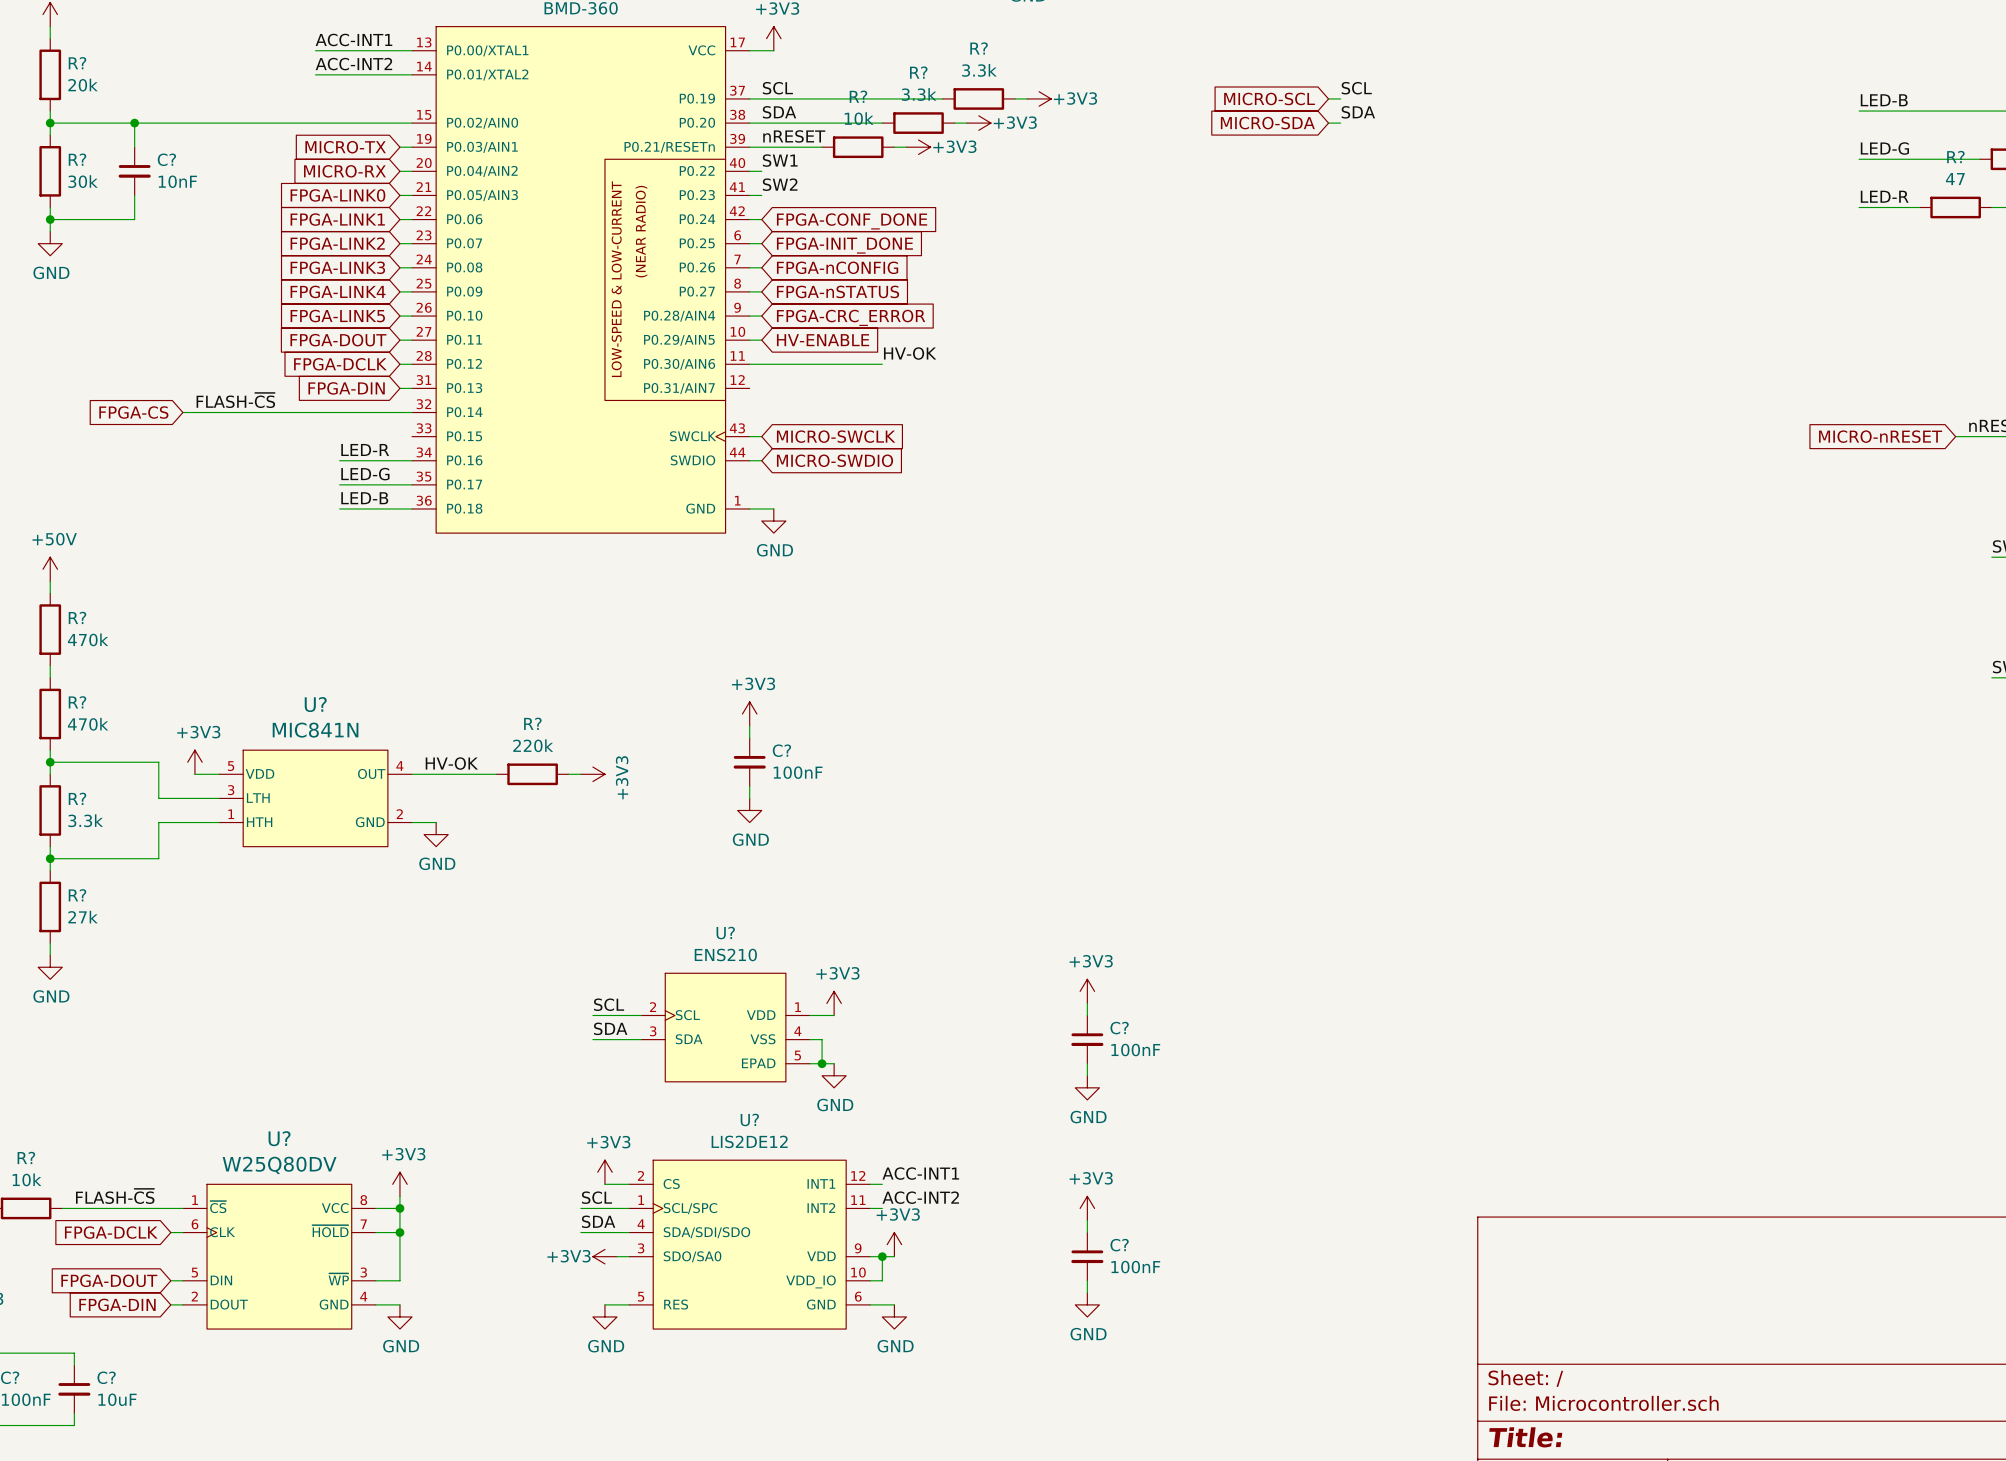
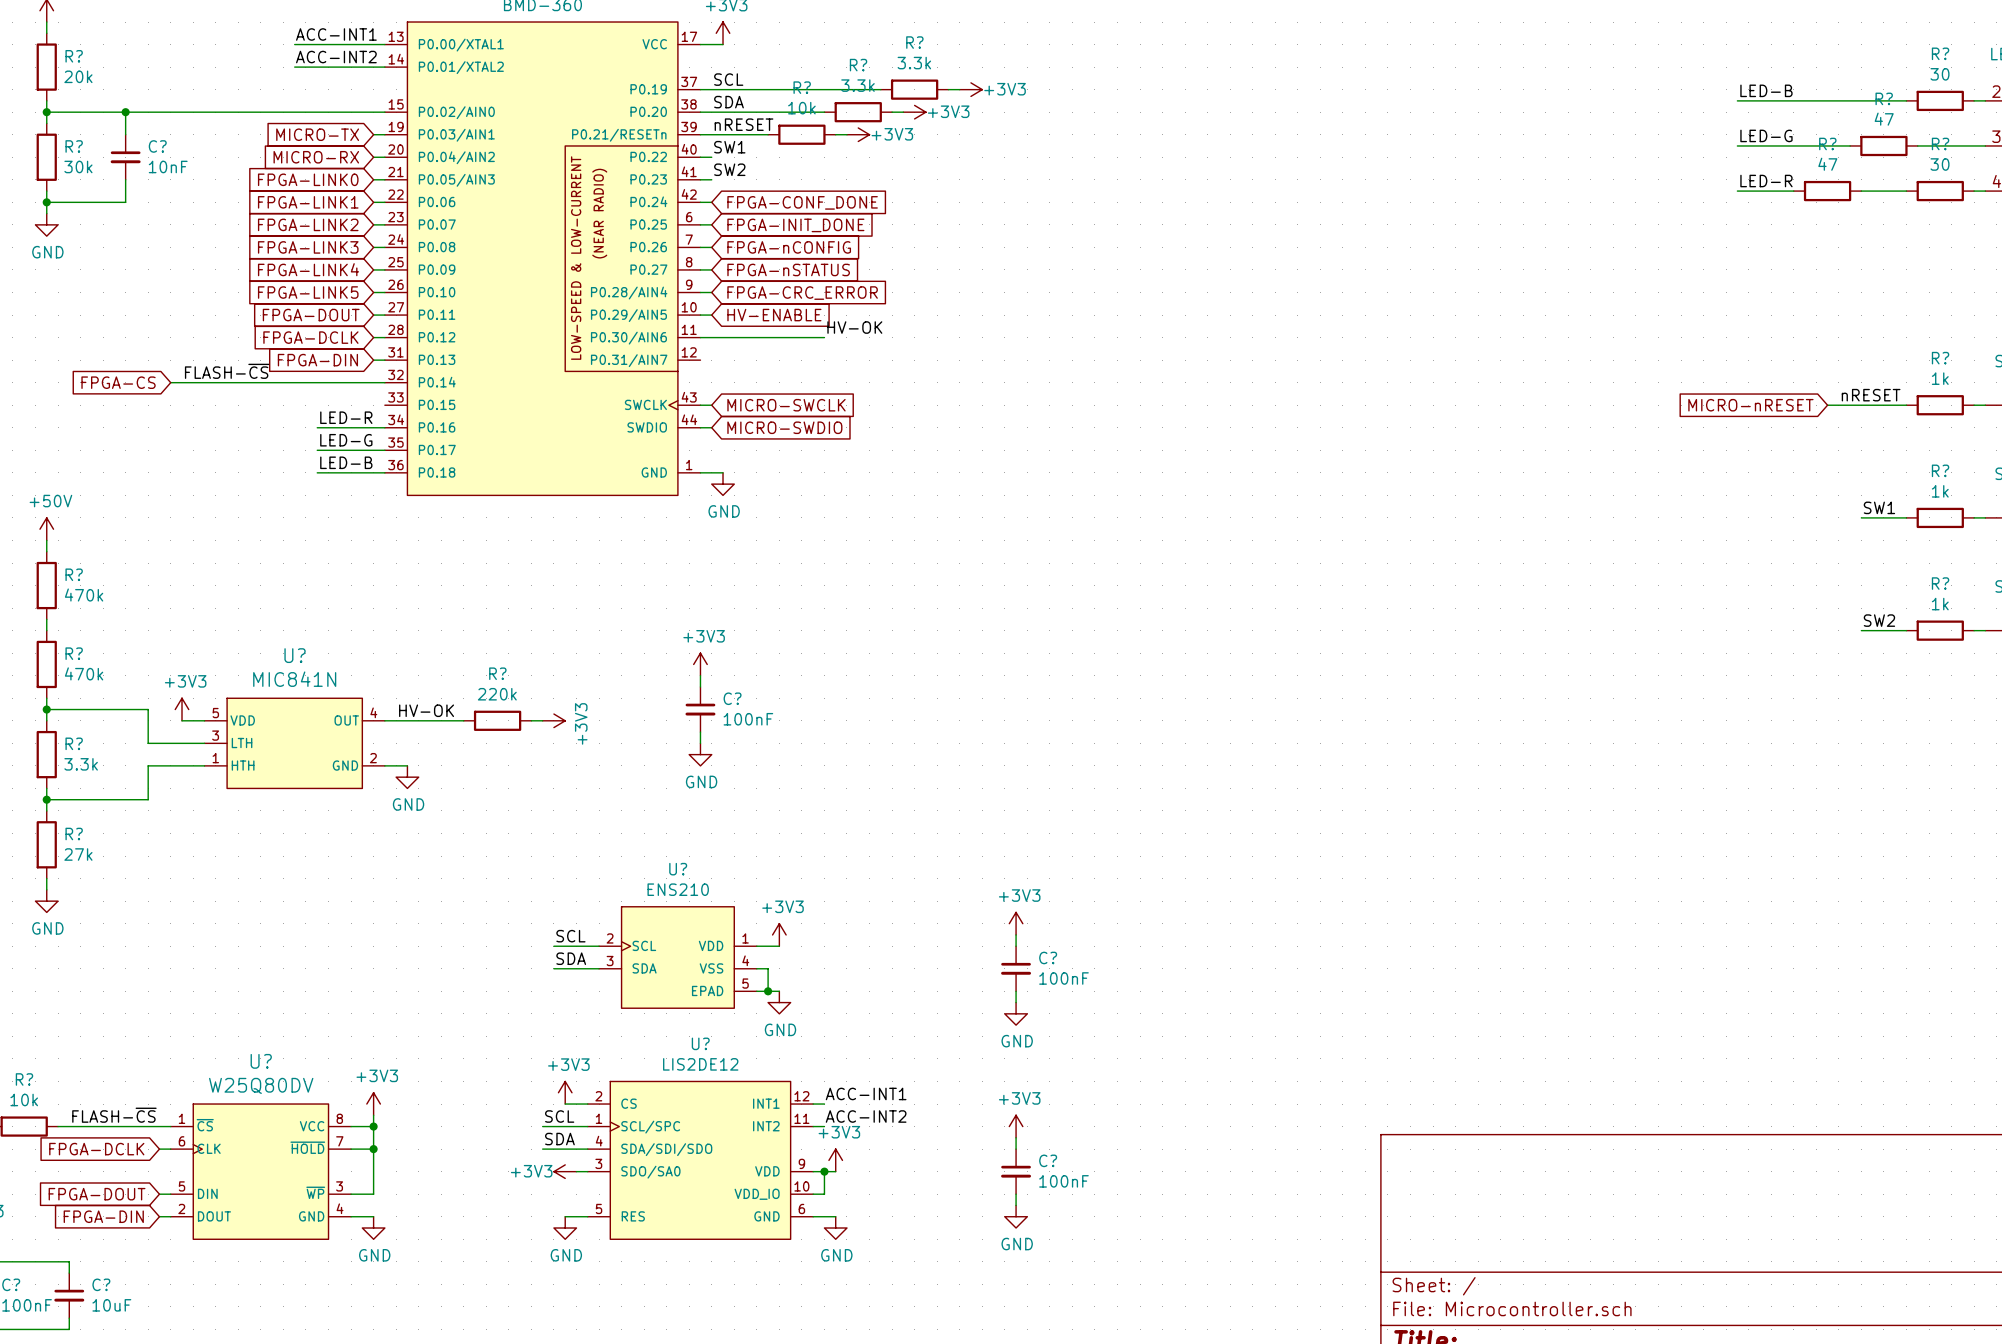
label: SCL (1356, 88) -> none
global label: MICRO-SCL (1269, 98) -> none
wire: (1328, 98) (1340, 98) -> none
label: SDA (1358, 112) -> none
global label: MICRO-SDA (1267, 123) -> none
wire: (1328, 123) (1340, 123) -> none

